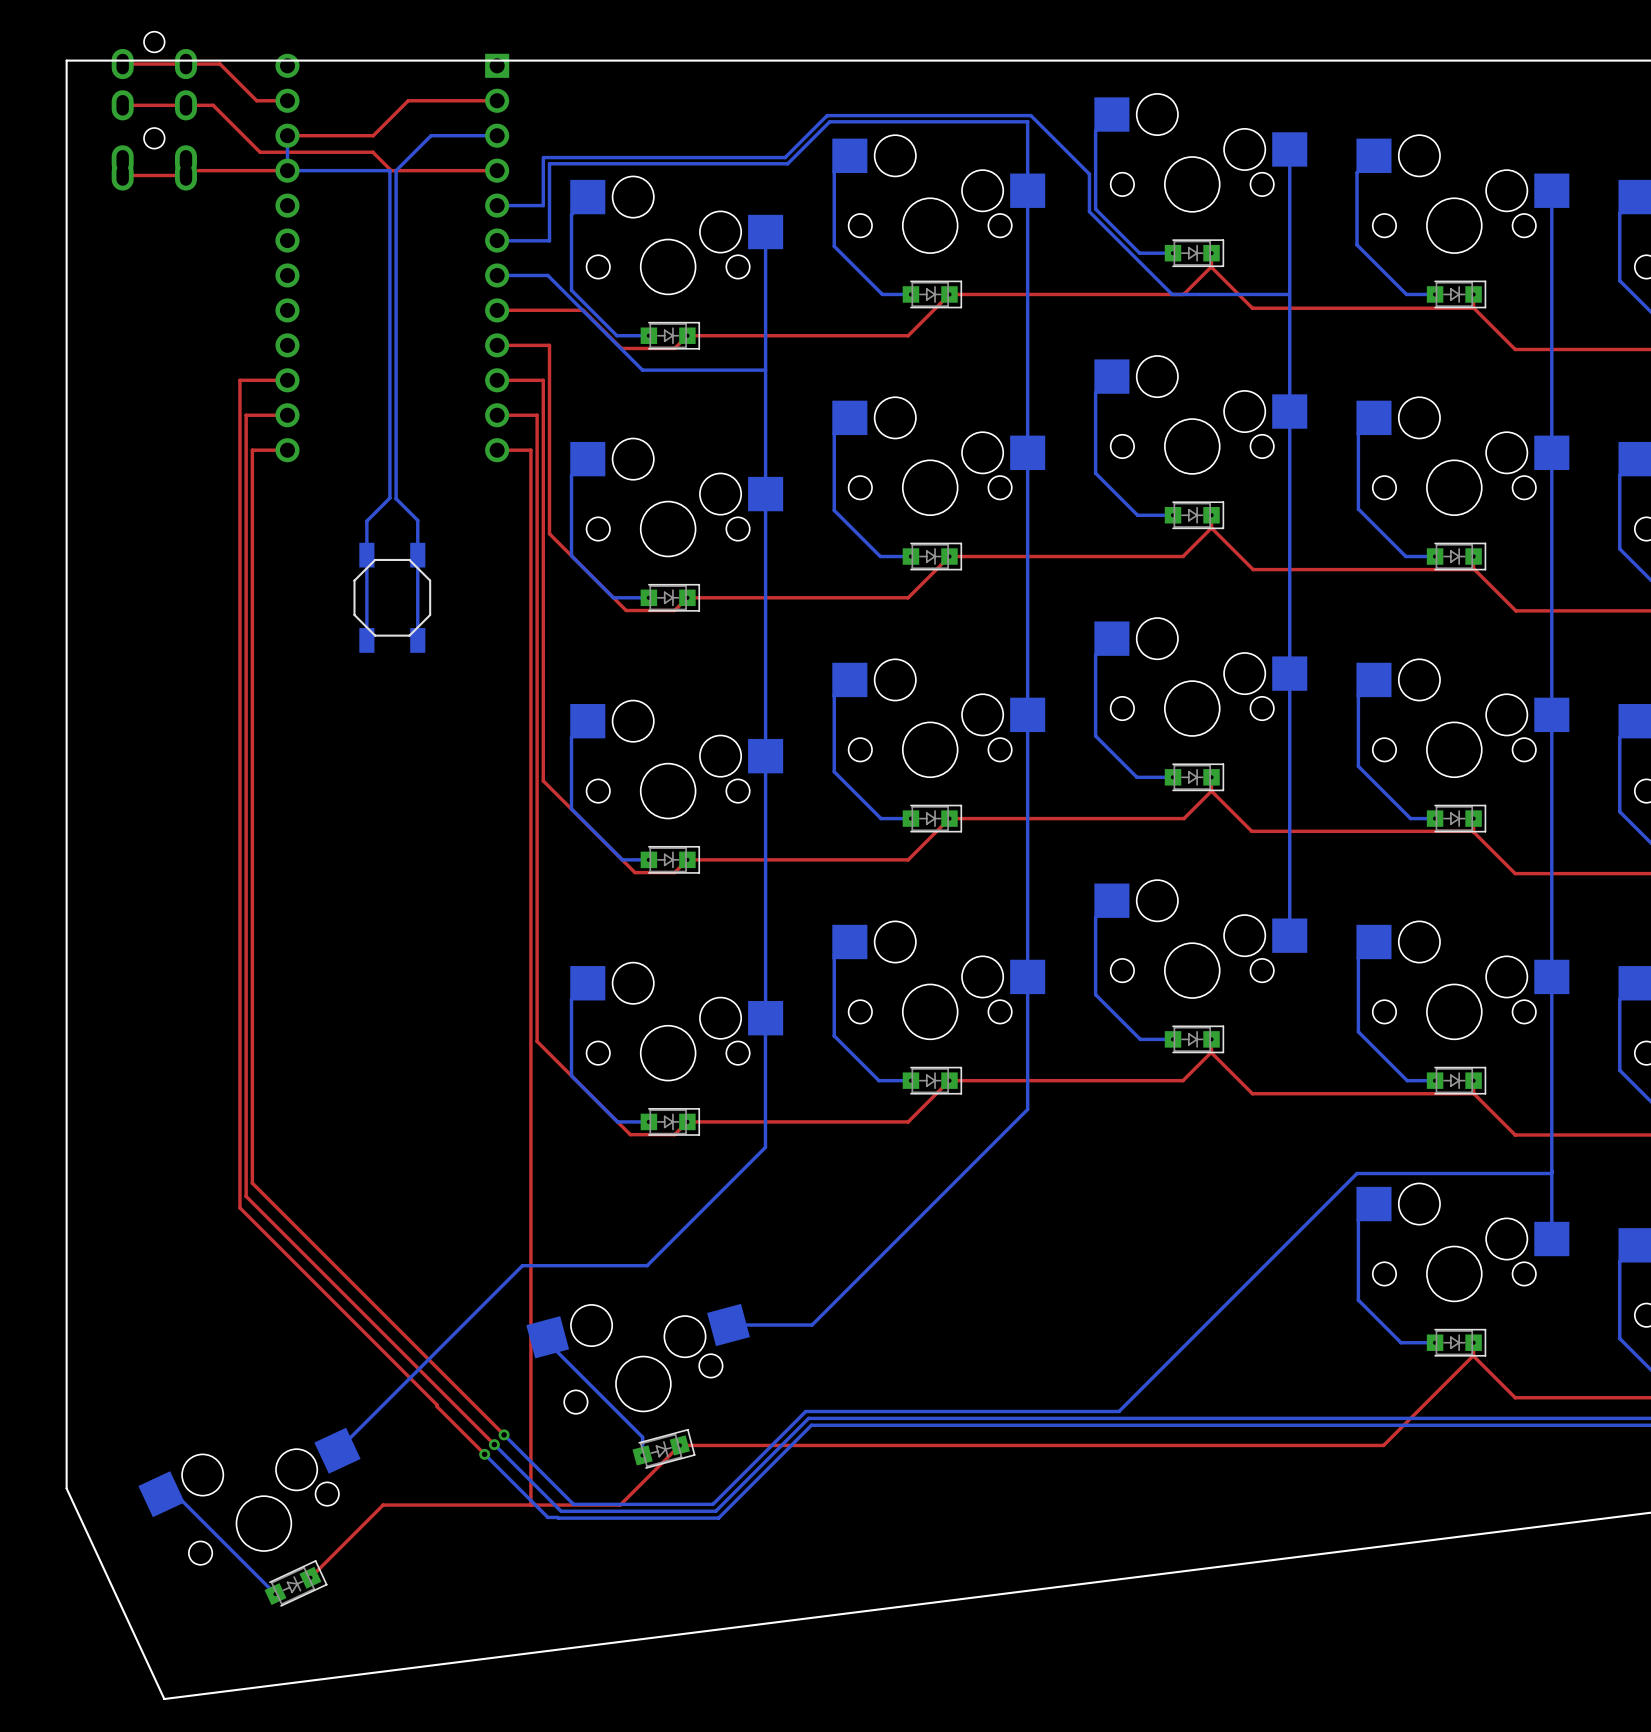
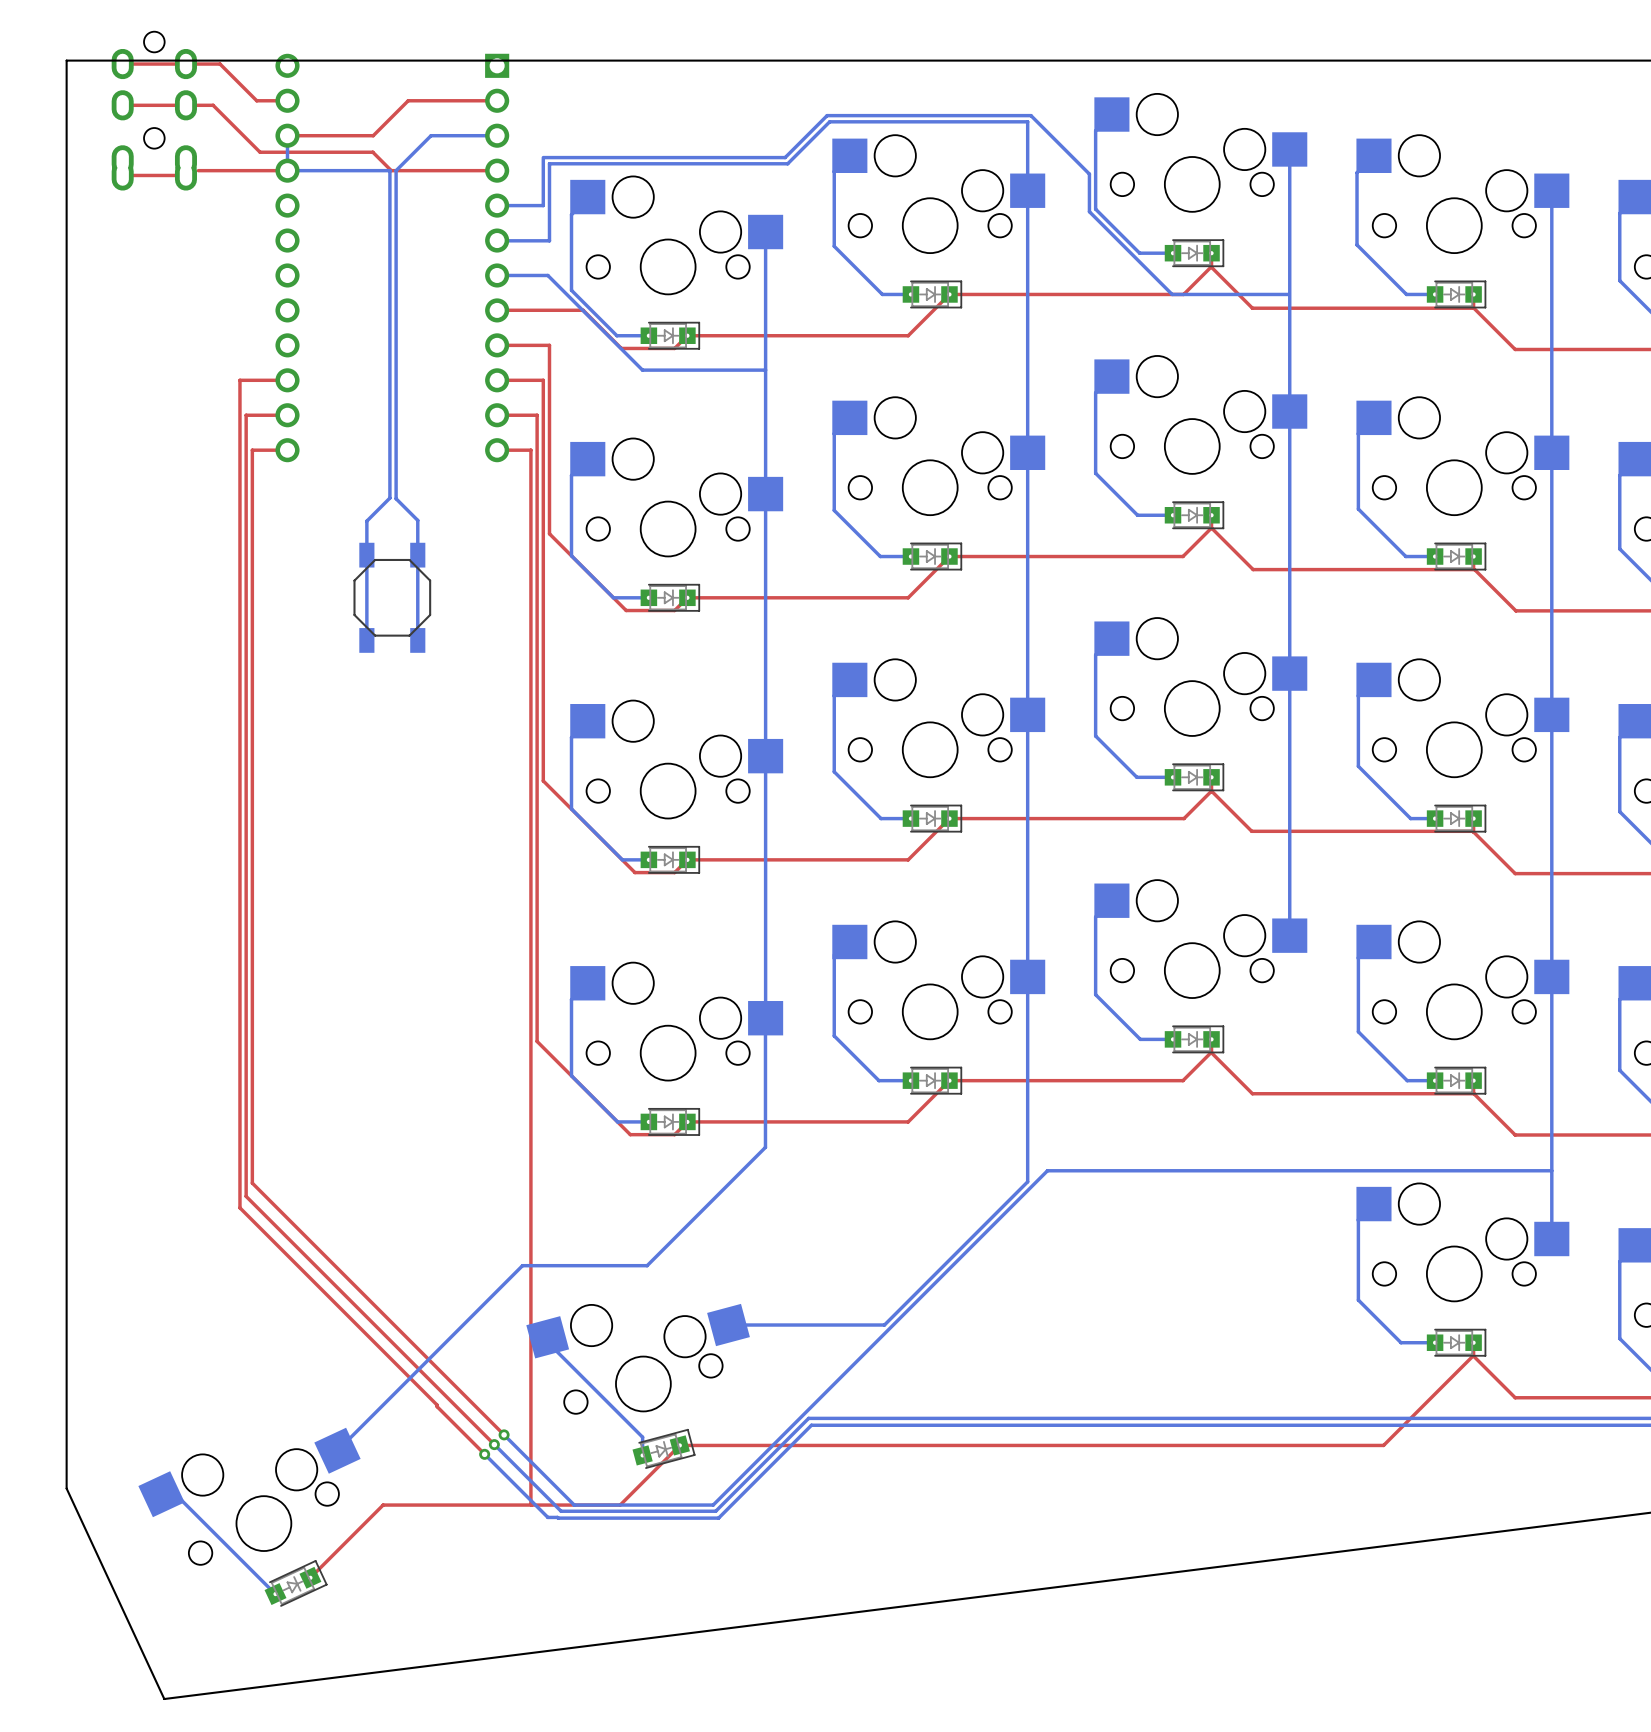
bottom track: (1027, 1109) (812, 1325) -> (1027, 1109) (1027, 1181) (884, 1325) (812, 1325)
bottom track: (1551, 1172) (1357, 1173) (1119, 1411) (805, 1411) (712, 1504) (573, 1504) -> (1551, 1170) (1047, 1170) (713, 1505) (573, 1504)

